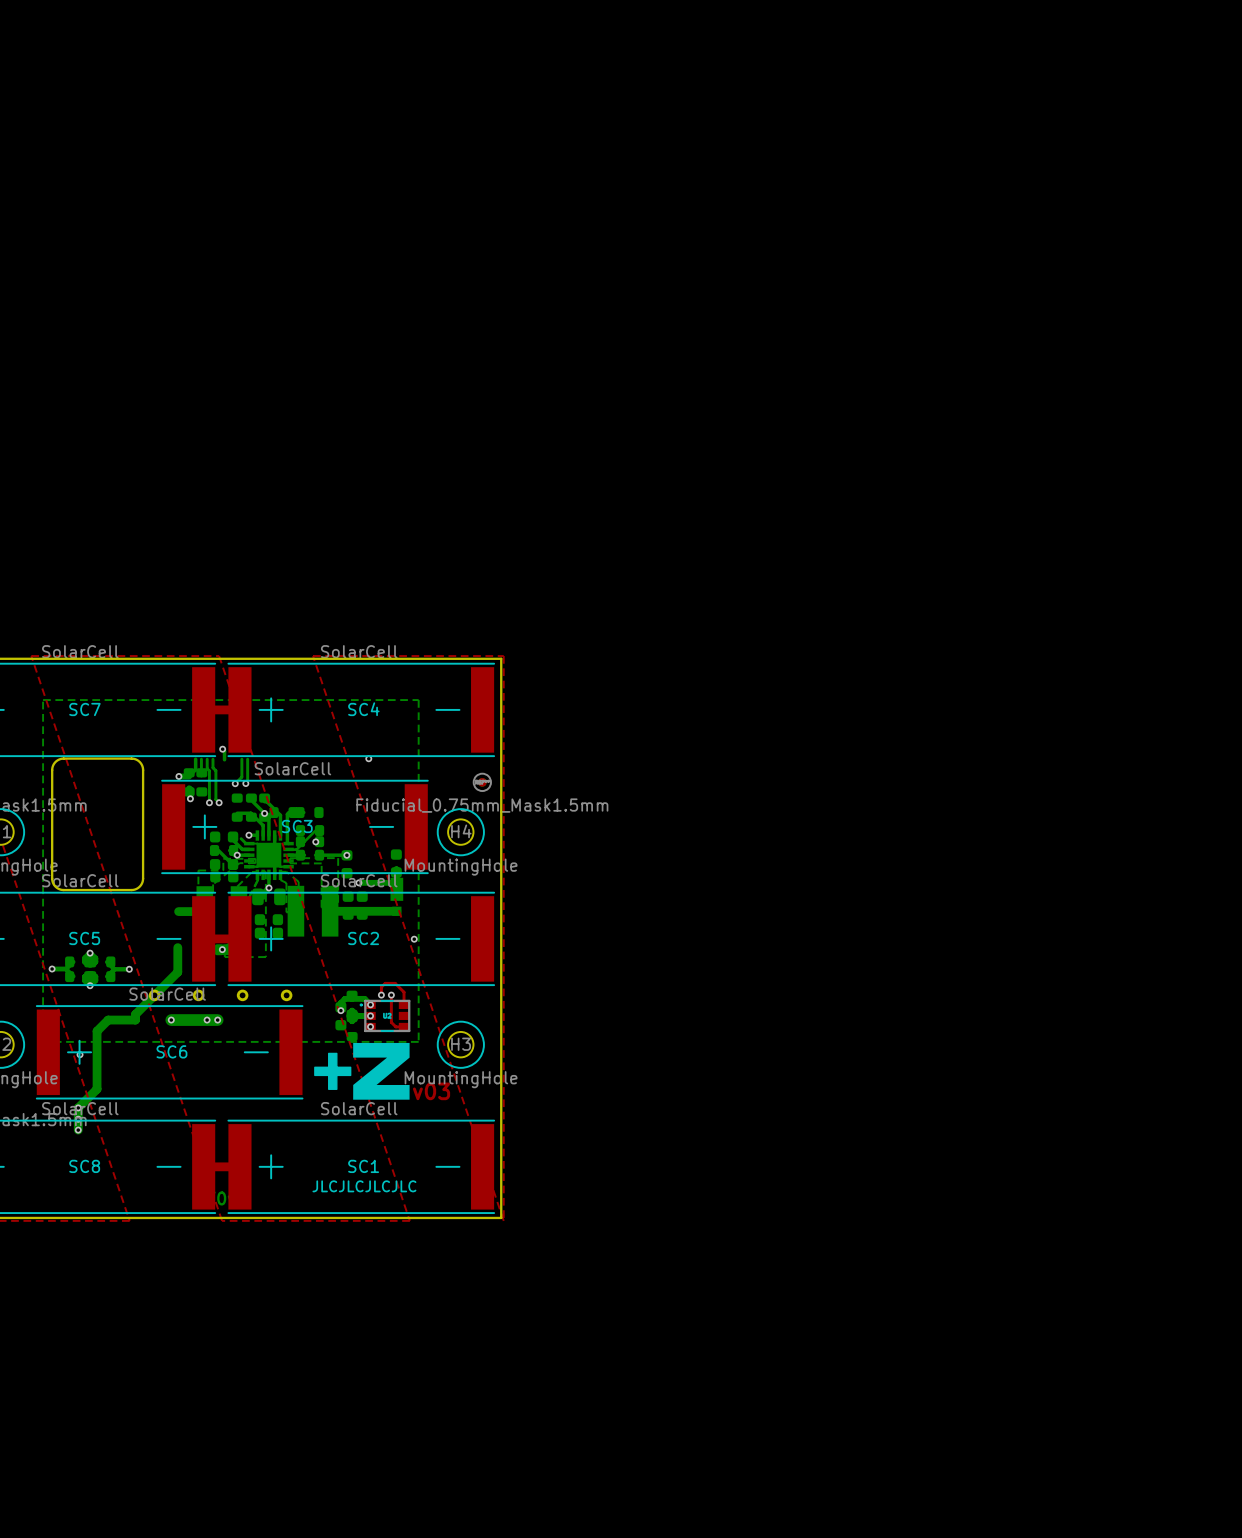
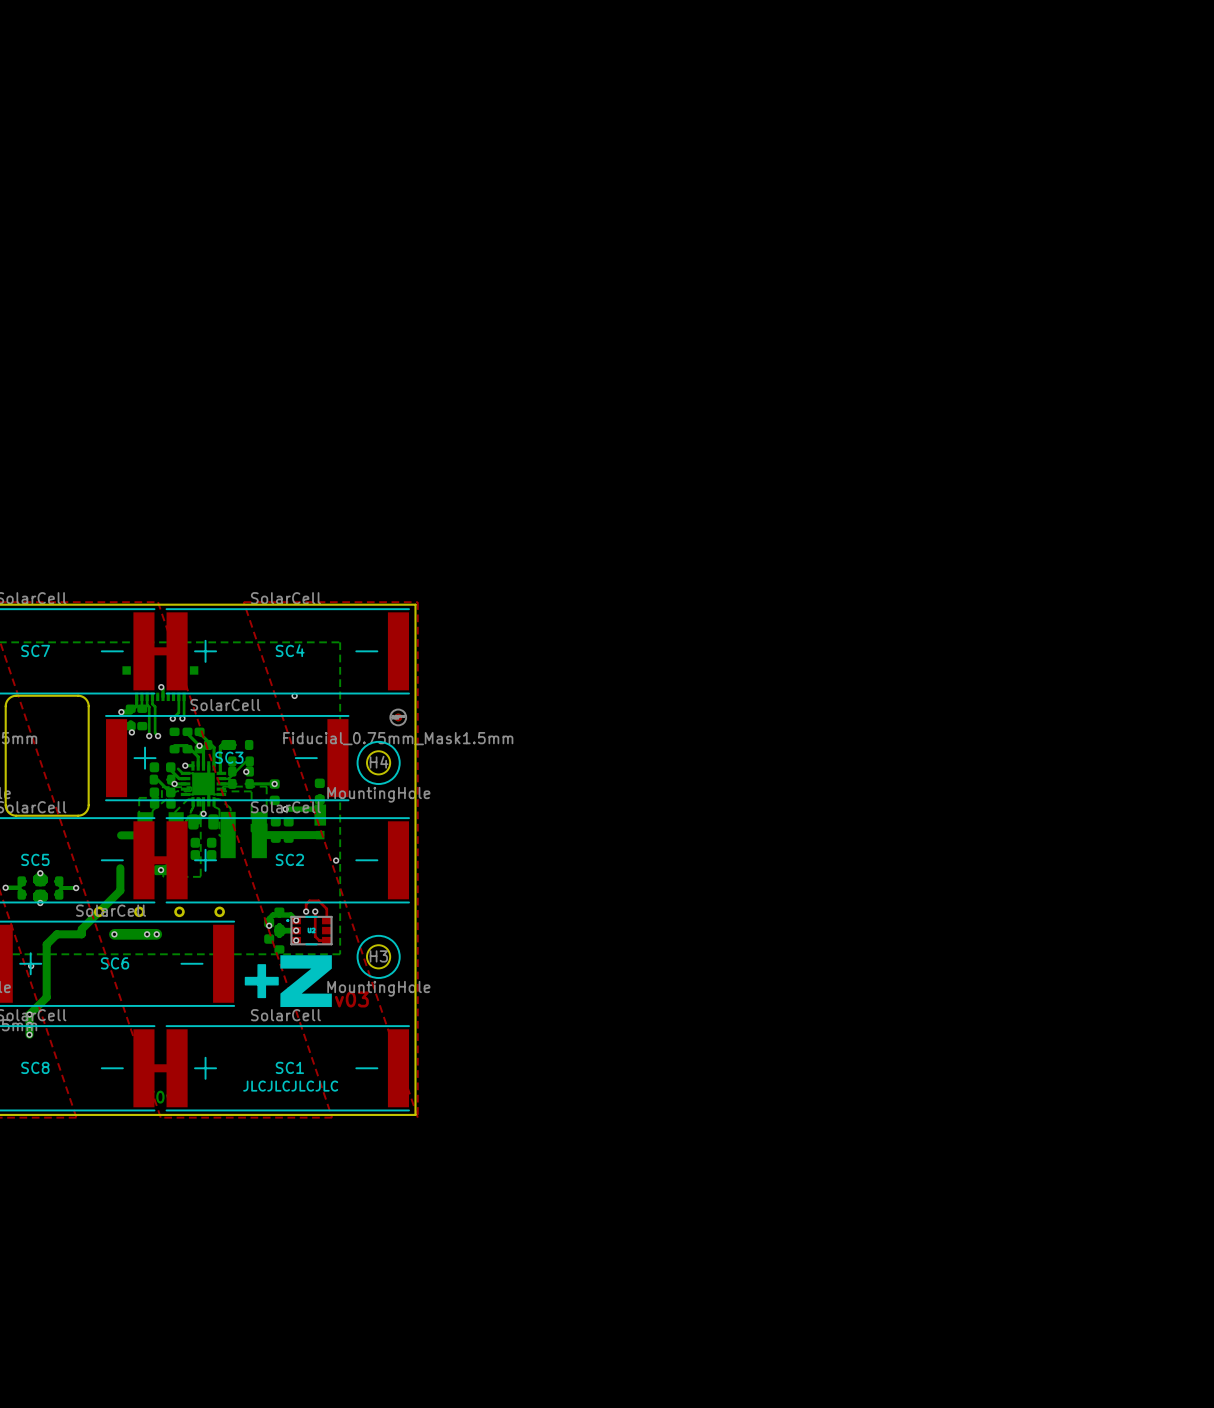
part: none -> (160, 683)

